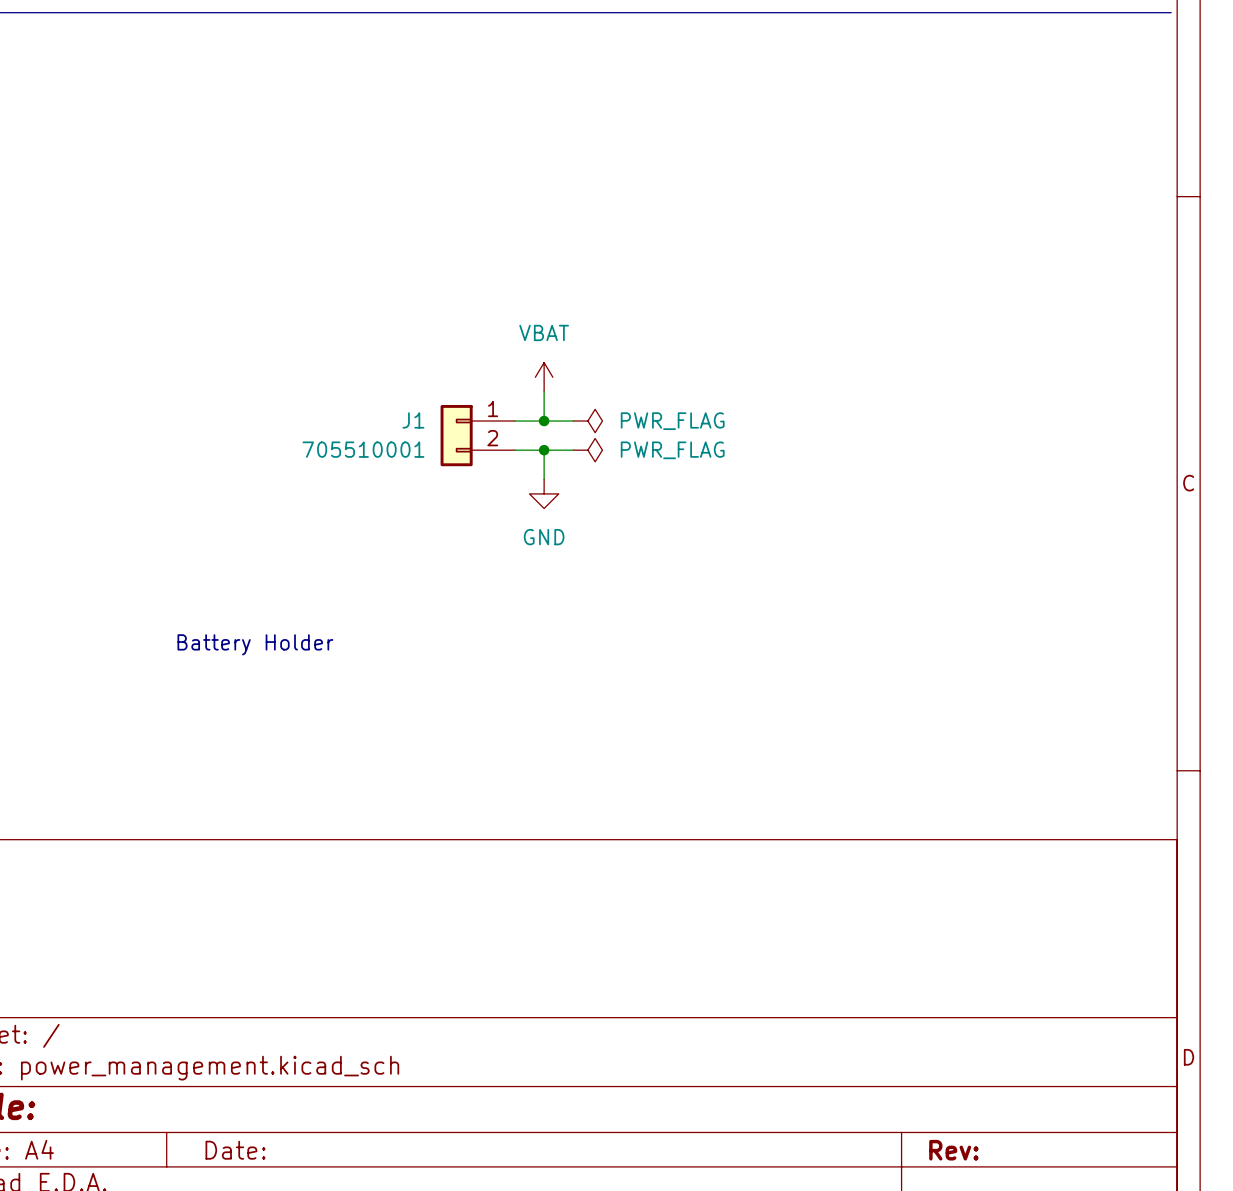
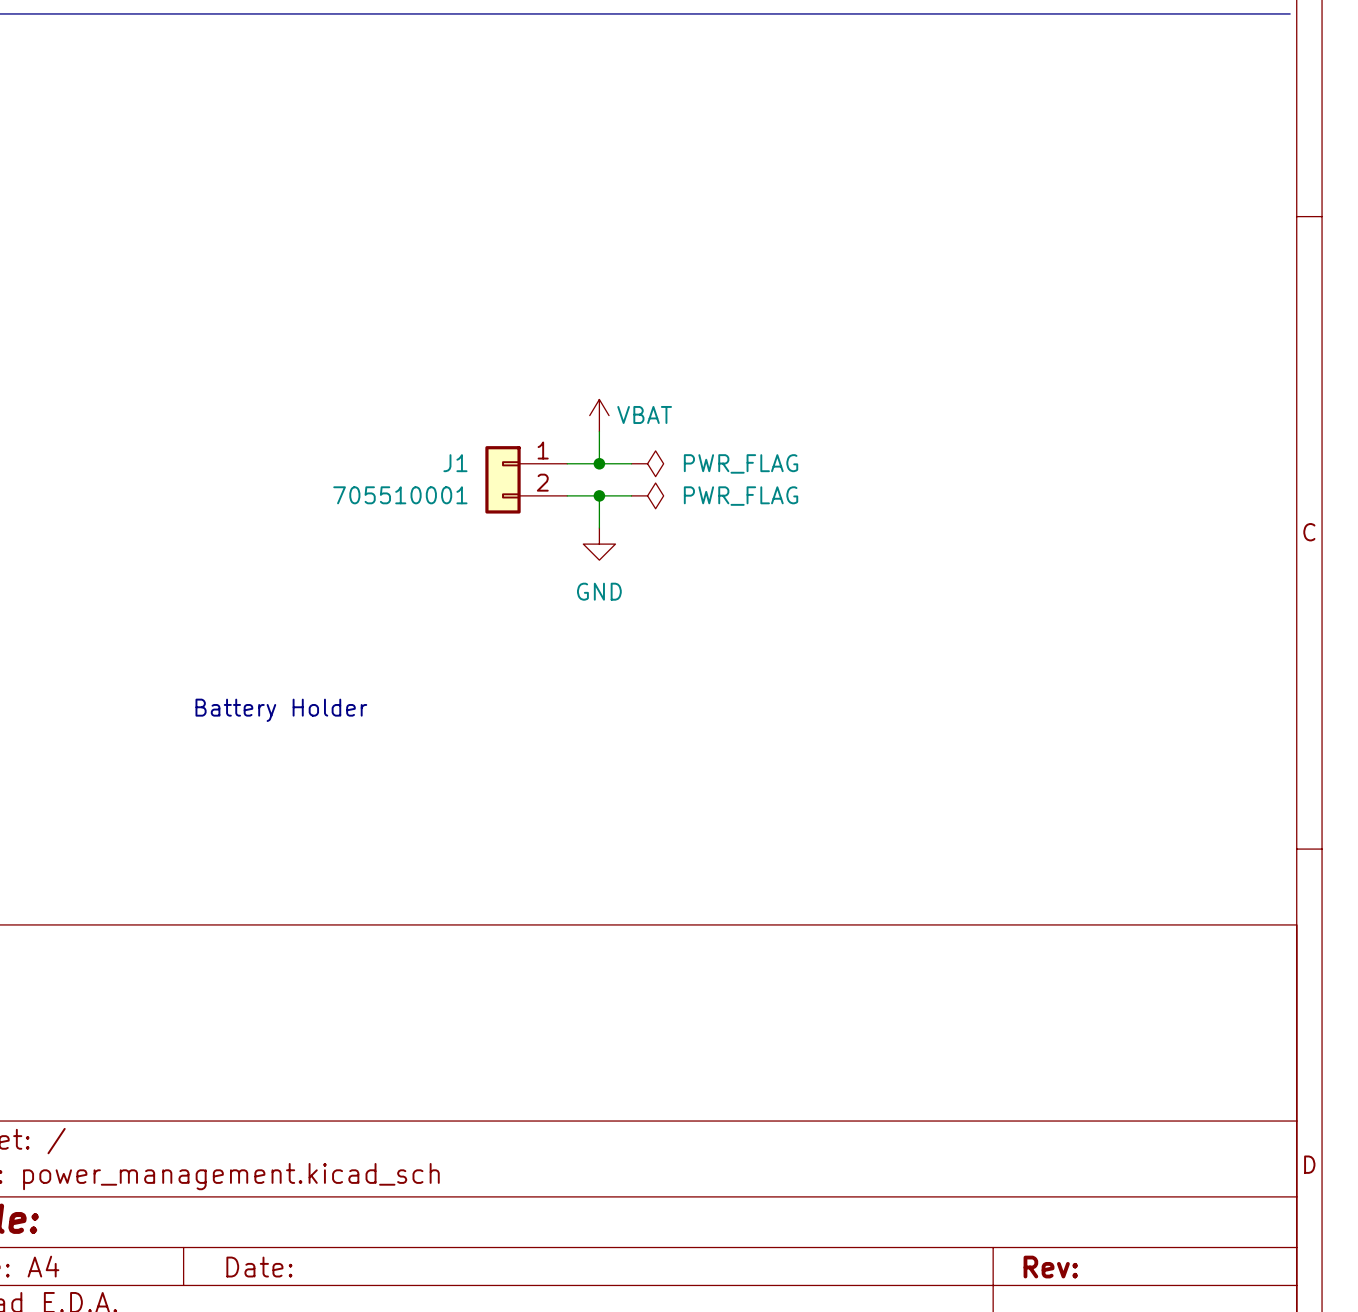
power symbol text position: VBAT (544, 332) -> VBAT (644, 414)

